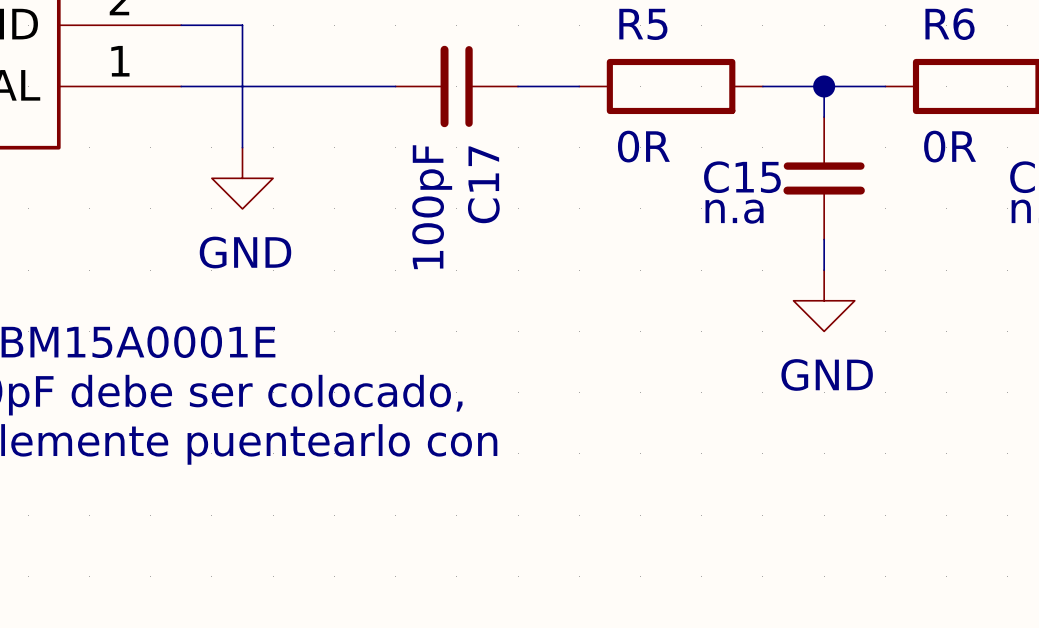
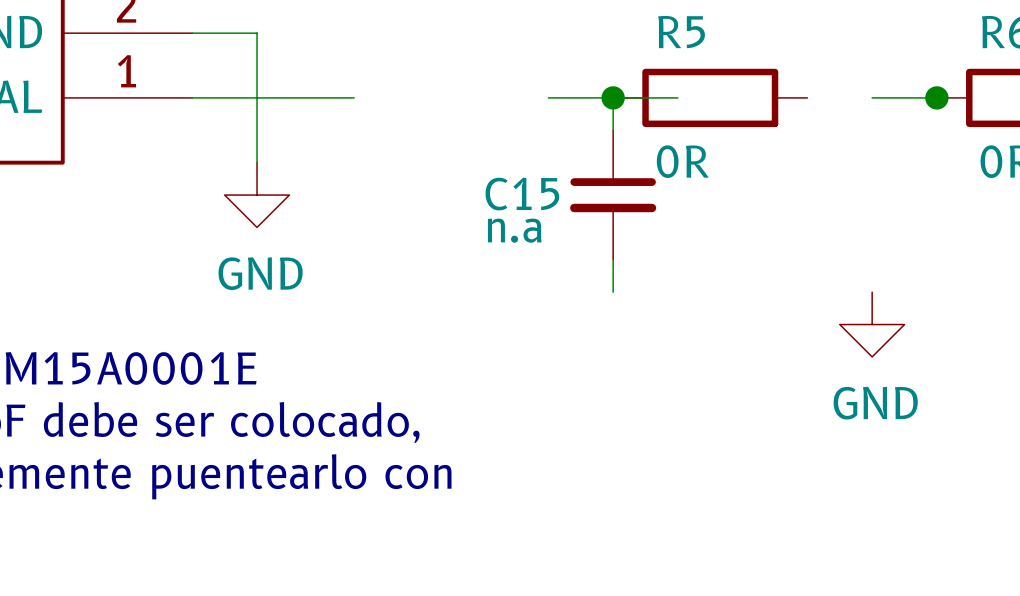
wire: (334, 86) (395, 86) -> none
C17: 100pF (456, 86) -> none
junction: none -> (613, 97)
wire: none -> (677, 97) (613, 97) (613, 130)
wire: (762, 86) (824, 86) (824, 117) -> none
junction position: (824, 86) -> (936, 97)
C15 position: (824, 178) -> (613, 195)
wire: (824, 239) (824, 270) -> (613, 259) (613, 292)

